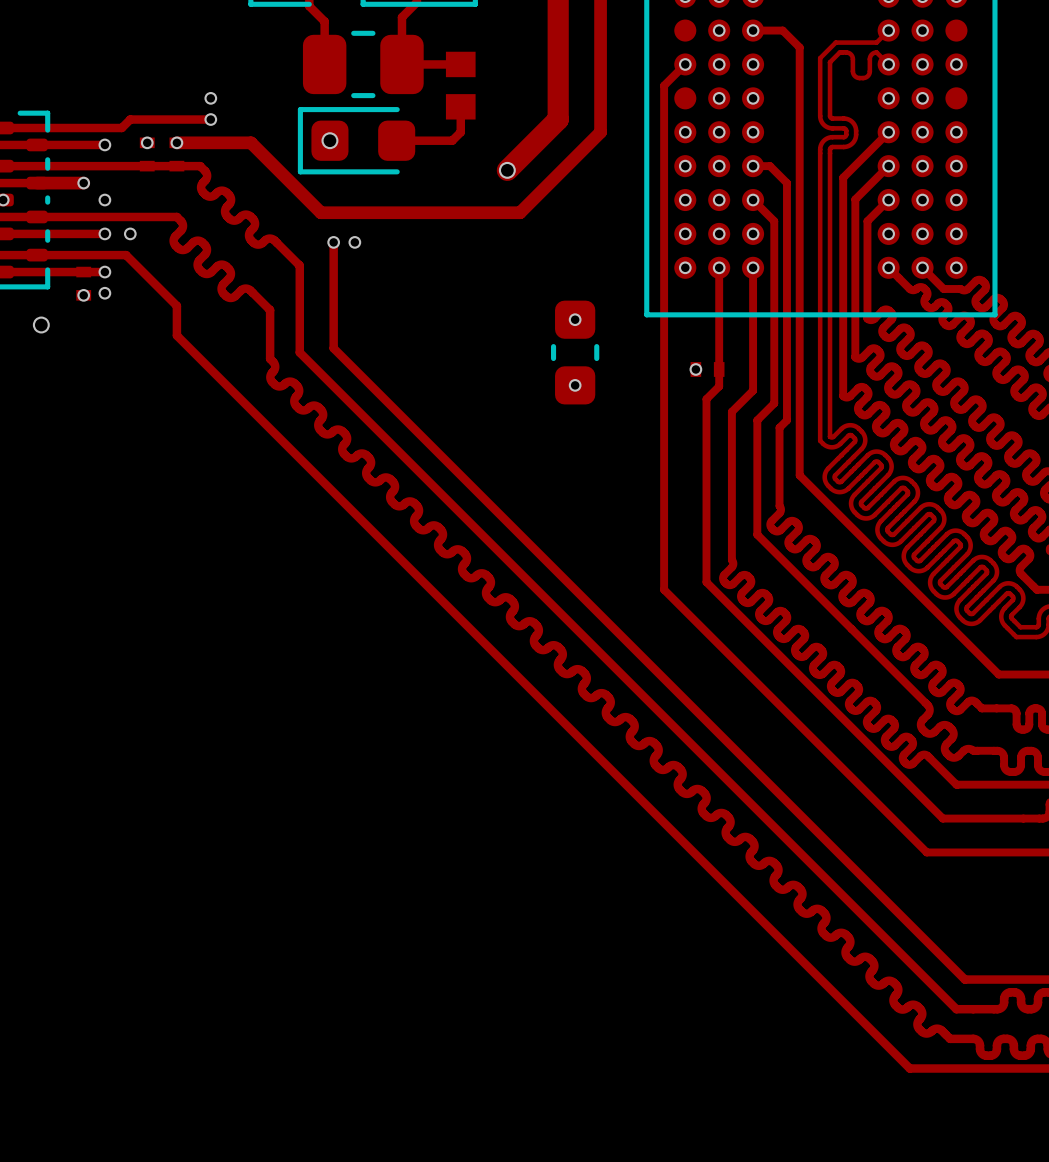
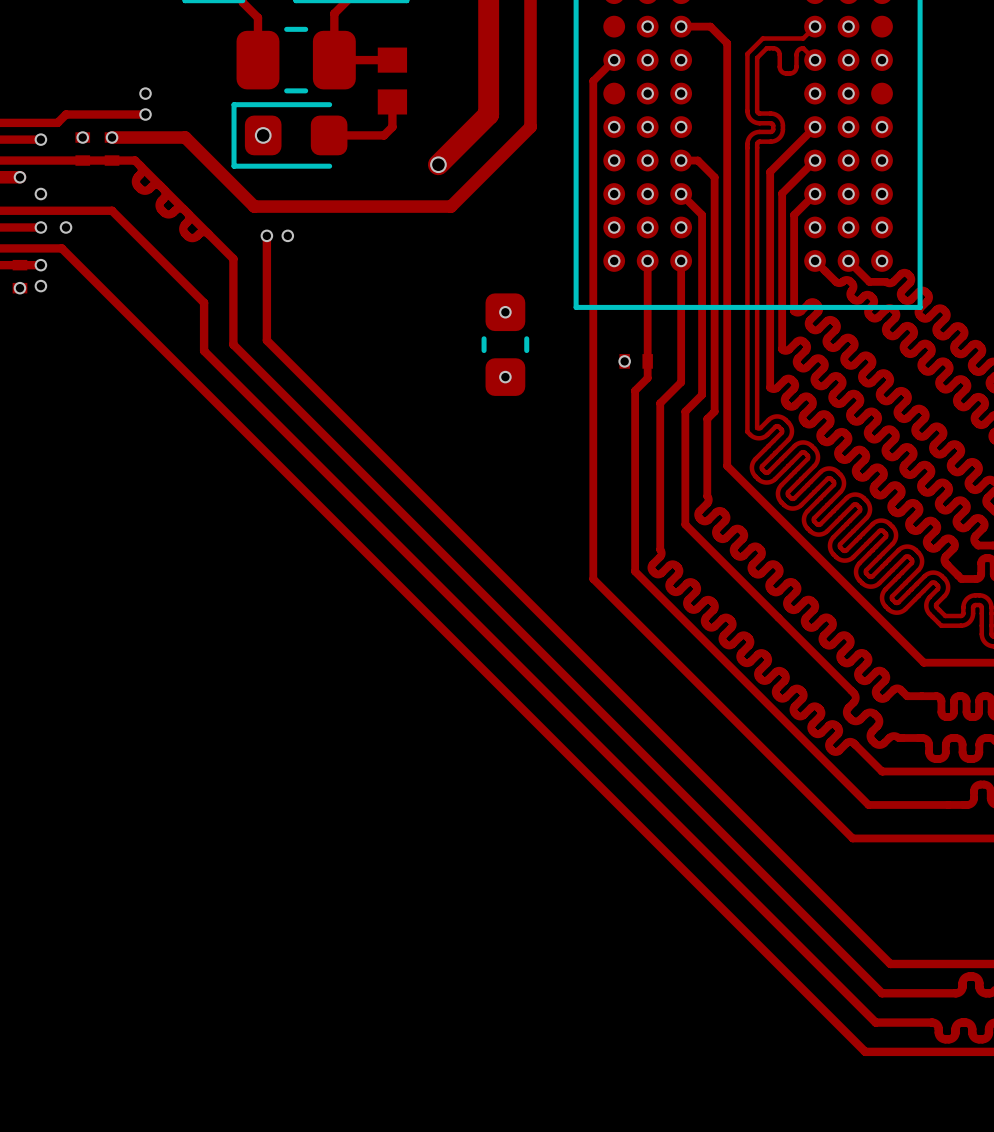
track: (181, 221) (182, 227) (174, 238) (175, 245) (183, 249) (195, 241) (202, 242) -> (116, 214) (137, 236)
track: (204, 245) (206, 251) (197, 262) (199, 269) (207, 273) (219, 265) (226, 266) -> (139, 238) (161, 259)
track: (228, 269) (230, 275) (221, 286) (223, 293) (231, 297) (243, 288) (250, 290) -> (163, 262) (184, 283)
track: (176, 305) (176, 335) (909, 1068) (939, 1068) -> (112, 298) (865, 1051)
track: (273, 362) (275, 368) (270, 378) (274, 384) (279, 386) (288, 381) (294, 383) (299, 390) (294, 399) (296, 406) (303, 410) (312, 405) (318, 407) (323, 413) (318, 423) (320, 430) (327, 434) (339, 429) (346, 435) (346, 440) (342, 449) (346, 456) (352, 458) (362, 453) (369, 458) (370, 464) (366, 473) (370, 480) (376, 482) (386, 477) (393, 482) (394, 488) (390, 497) (394, 504) (400, 506) (410, 501) (417, 506) (418, 512) (414, 521) (418, 528) (424, 530) (434, 525) (441, 530) (442, 536) (438, 545) (442, 552) (448, 554) (458, 549) (465, 554) (466, 560) (462, 569) (466, 576) (472, 578) (482, 573) (488, 577) (490, 584) (486, 593) (490, 600) (496, 601) (506, 597) (512, 601) (514, 607) (510, 617) (514, 624) (520, 625) (530, 621) (536, 625) (538, 631) (534, 641) (538, 648) (544, 649) (554, 645) (560, 649) (562, 655) (557, 665) (562, 672) (568, 673) (578, 669) (584, 673) (586, 679) (581, 689) (586, 696) (592, 697) (602, 693) (608, 697) (610, 703) (605, 713) (610, 720) (616, 721) (626, 717) (632, 721) (634, 727) (629, 737) (634, 743) (640, 745) (650, 741) (656, 745) (658, 751) (653, 761) (658, 767) (664, 769) (674, 765) (680, 769) (682, 775) (677, 785) (682, 791) (688, 793) (698, 789) (704, 793) (706, 799) (701, 809) (706, 815) (712, 817) (722, 813) (728, 817) (730, 823) (725, 833) (730, 839) (736, 841) (746, 836) (752, 841) (754, 847) (749, 857) (754, 863) (760, 865) (770, 860) (776, 865) (778, 871) (773, 881) (778, 887) (784, 889) (794, 884) (800, 889) (802, 895) (797, 905) (801, 911) (808, 913) (818, 908) (824, 913) (826, 919) (821, 929) (825, 935) (832, 937) (841, 932) (848, 937) (850, 943) (845, 953) (849, 959) (856, 961) (865, 956) (872, 961) (874, 967) (869, 977) (873, 983) (880, 985) (889, 980) (896, 985) (898, 991) (893, 1001) (897, 1007) (904, 1009) (913, 1004) (920, 1009) (922, 1015) (917, 1025) (921, 1031) (928, 1033) (937, 1028) (944, 1033) -> (207, 354) (870, 1016)
track: (997, 1009) (1002, 1006) (1005, 995) (1010, 992) (1019, 994) (1021, 1005) (1027, 1009) -> (922, 993) (952, 993)
track: (973, 1038) (979, 1042) (981, 1053) (986, 1055) (994, 1053) (997, 1042) (1003, 1038) -> (898, 1022) (928, 1022)

